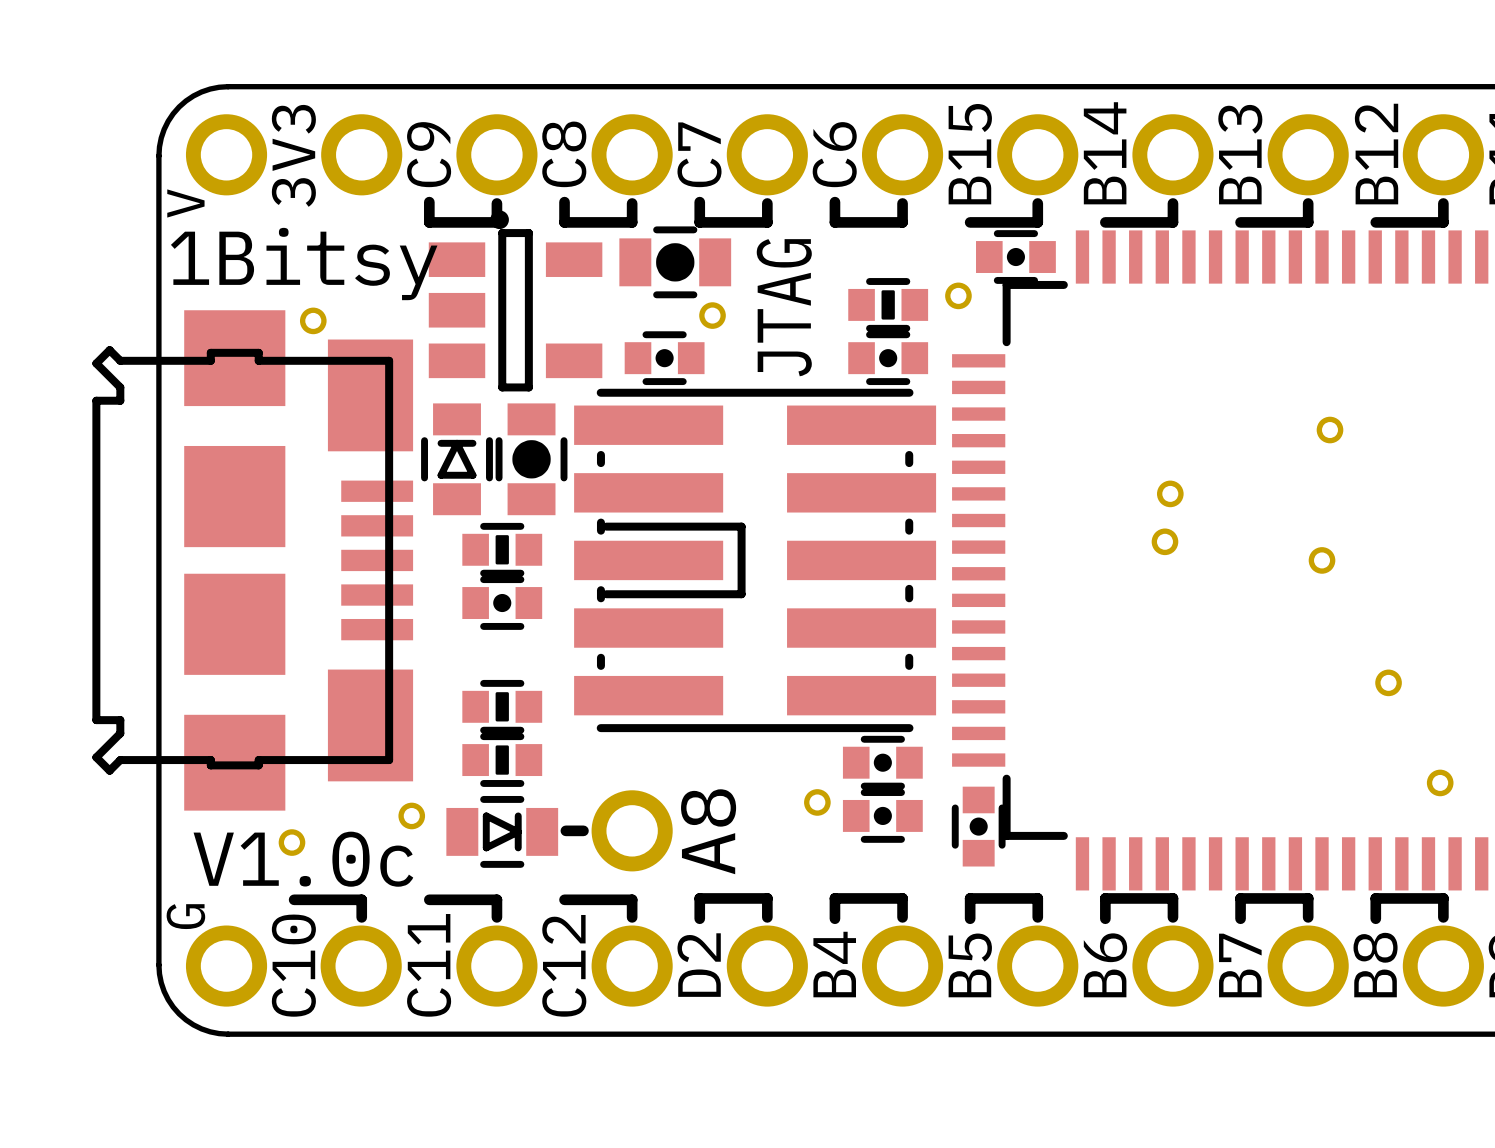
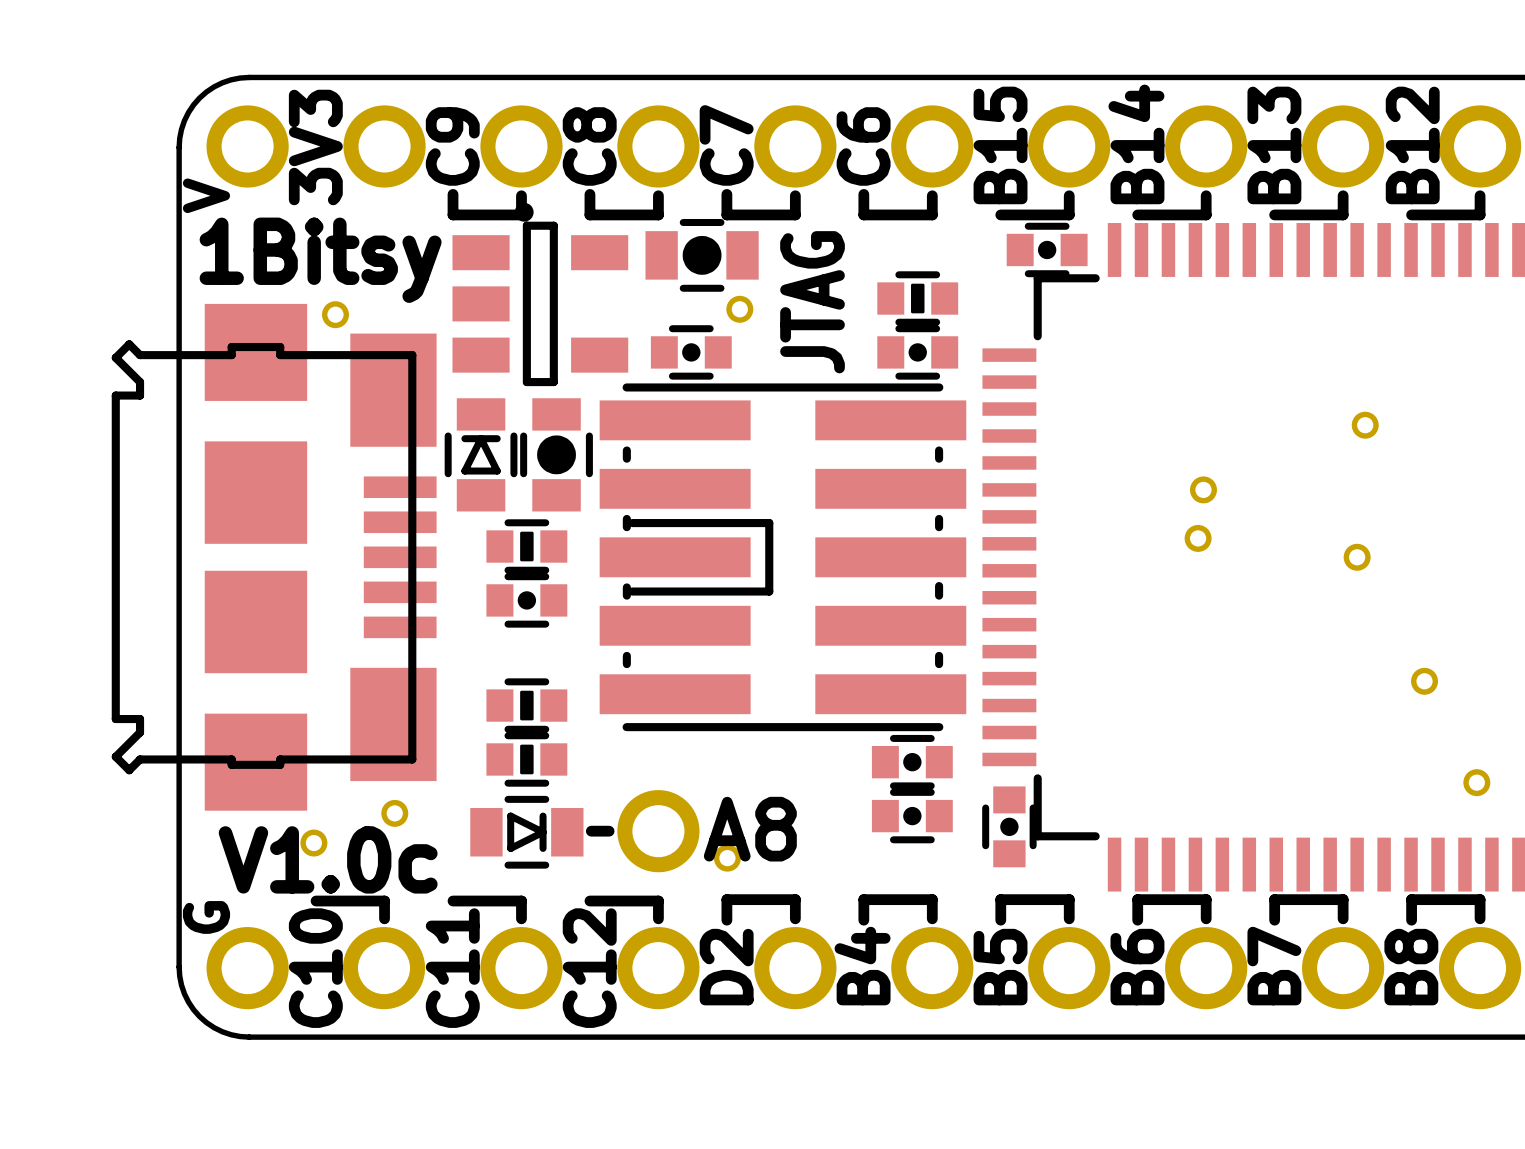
part: (958, 295) -> none
part position: (817, 802) -> (727, 858)
part position: (411, 815) -> (394, 813)
text rotation: 0° (708, 831) -> 90° clockwise (750, 829)

